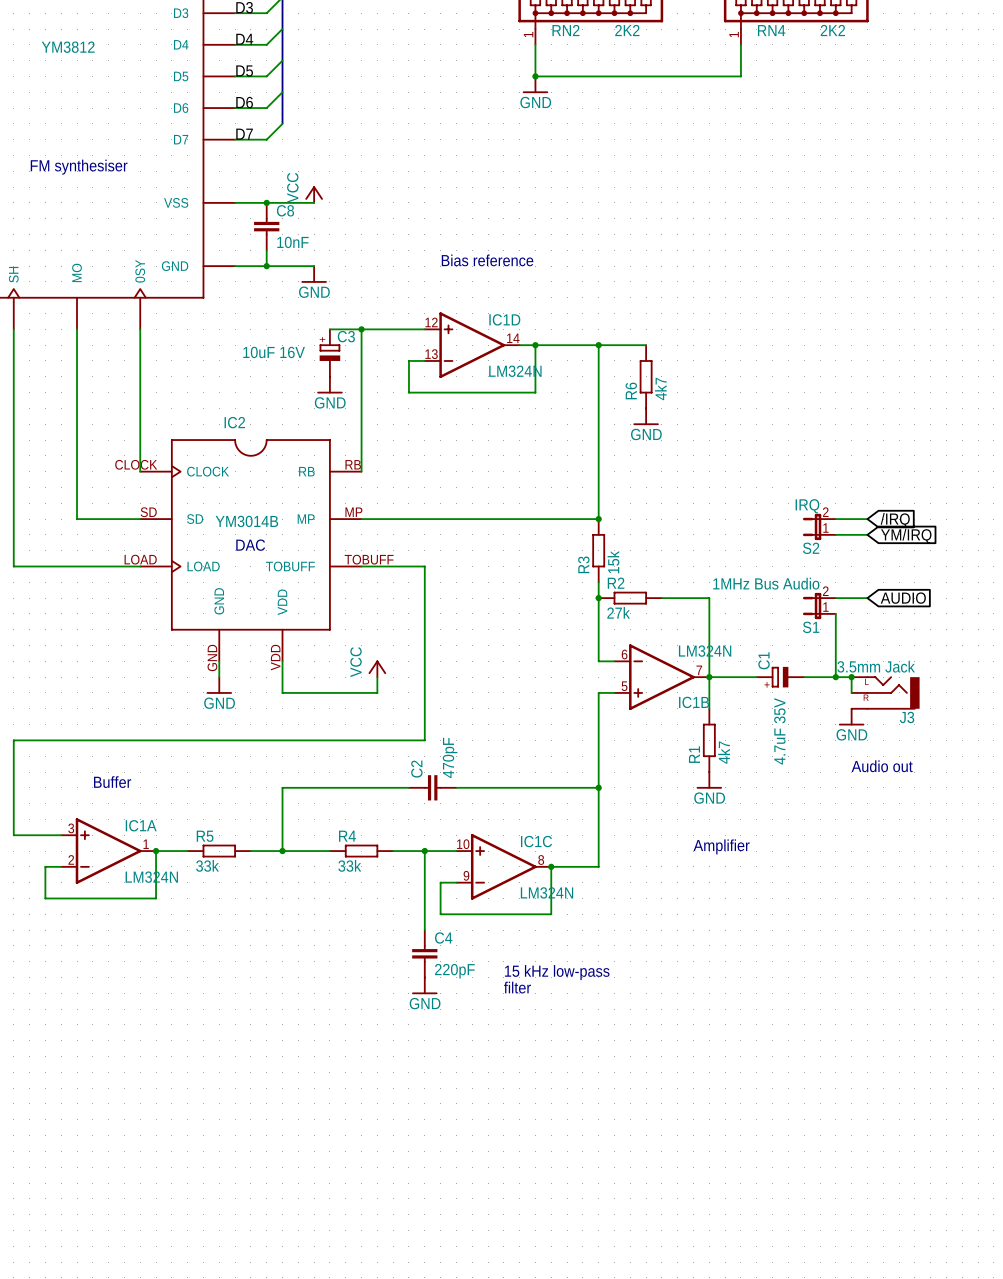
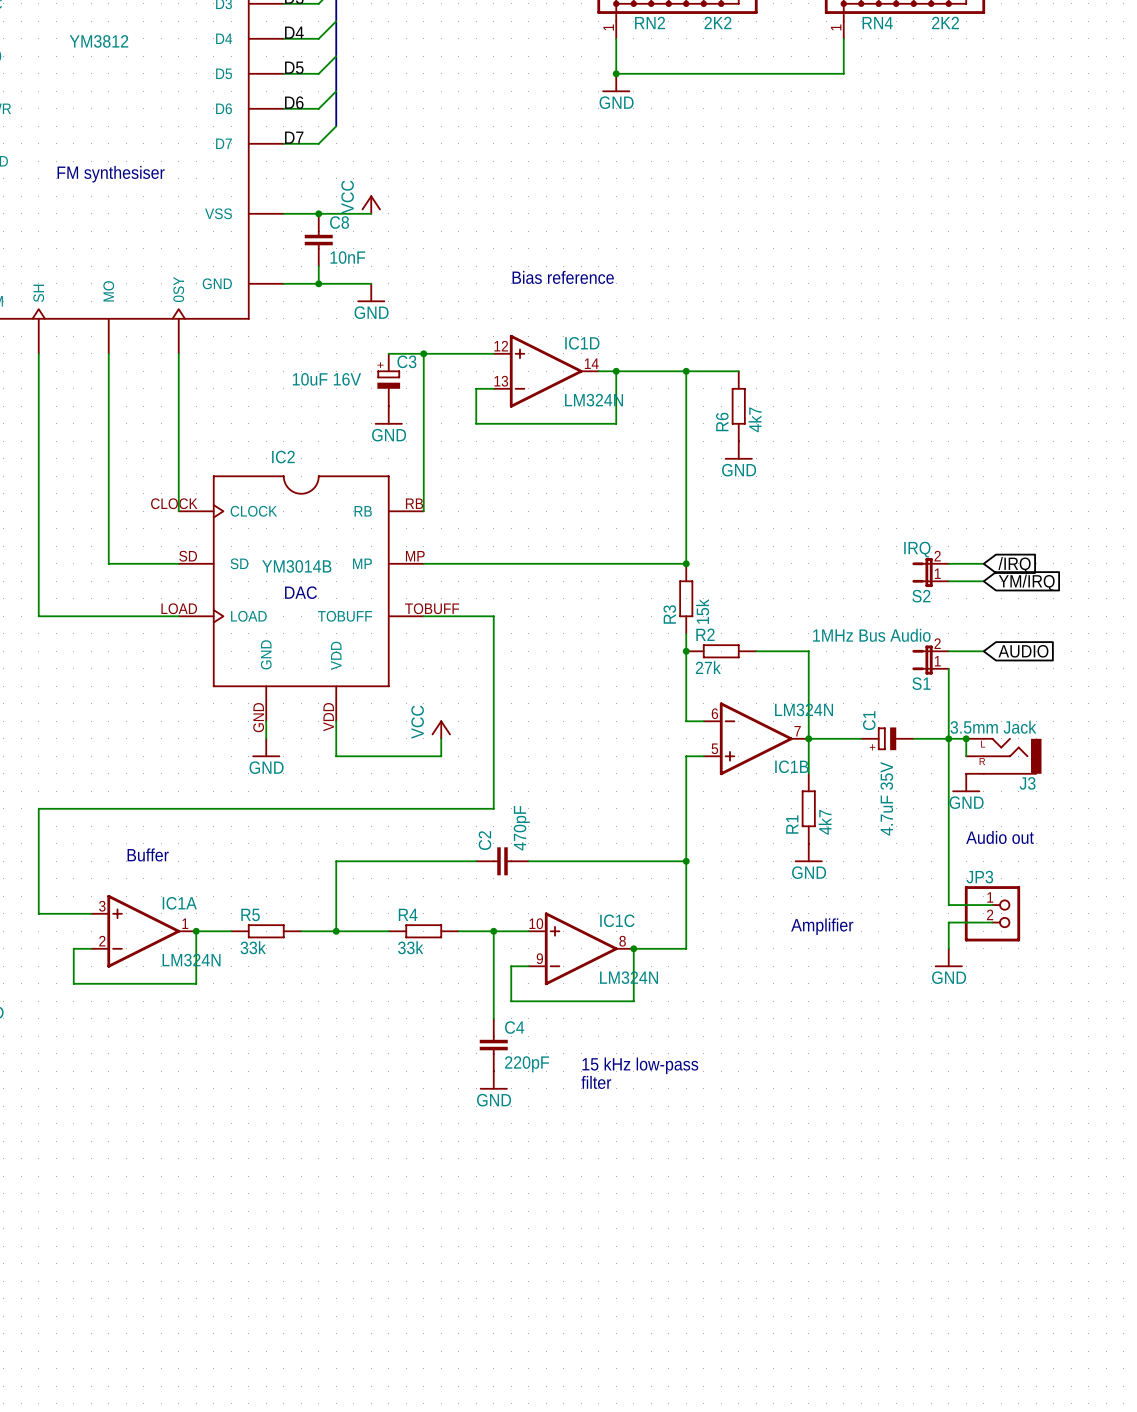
wire: none -> (948, 738) (948, 905) (992, 905)
JP3: none -> (992, 913)
wire: none -> (992, 922) (948, 922) (948, 948)
power symbol: none -> GND (948, 957)

